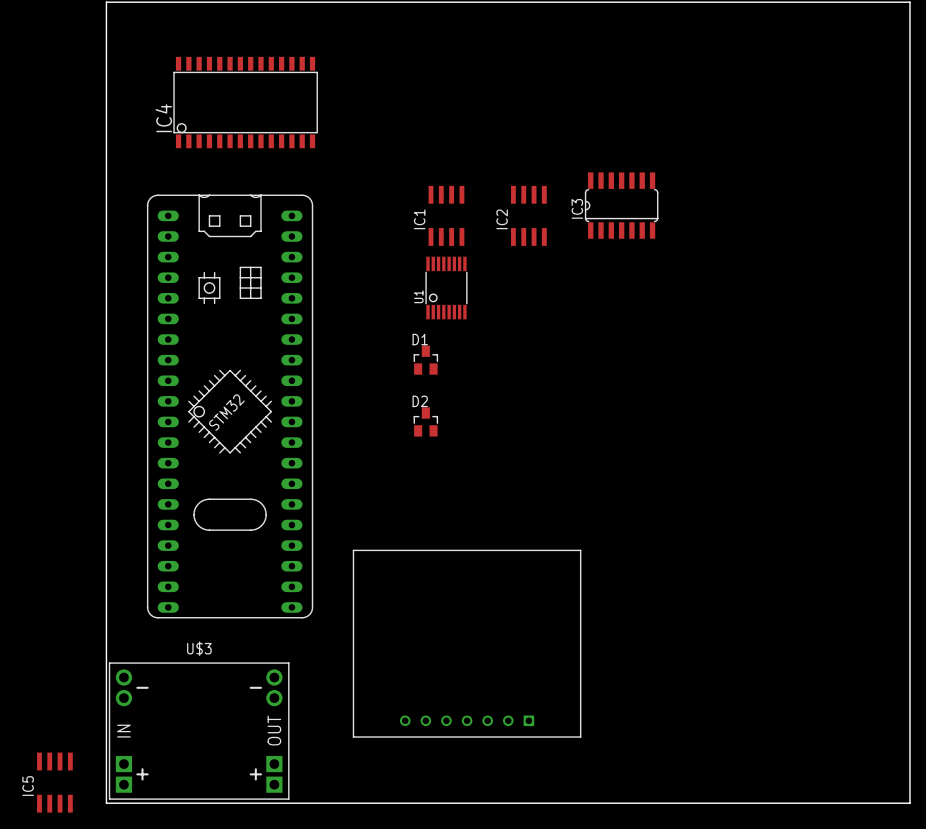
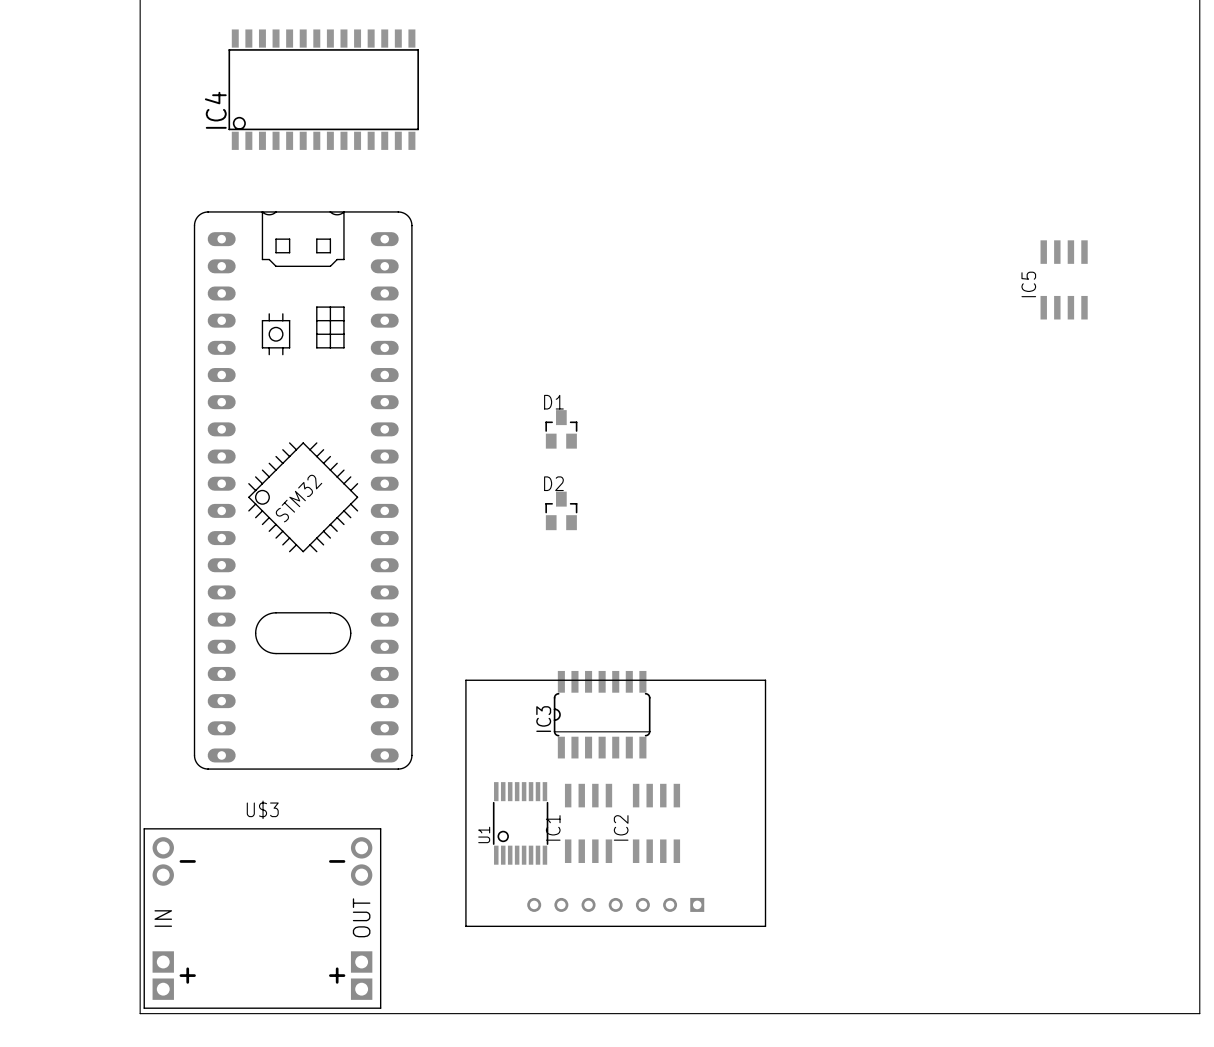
IC3 position: (621, 205) -> (602, 714)
IC1 position: (446, 215) -> (588, 823)
IC2 position: (528, 215) -> (656, 823)
U1 position: (446, 288) -> (520, 823)
IC5 position: (54, 782) -> (1064, 279)

